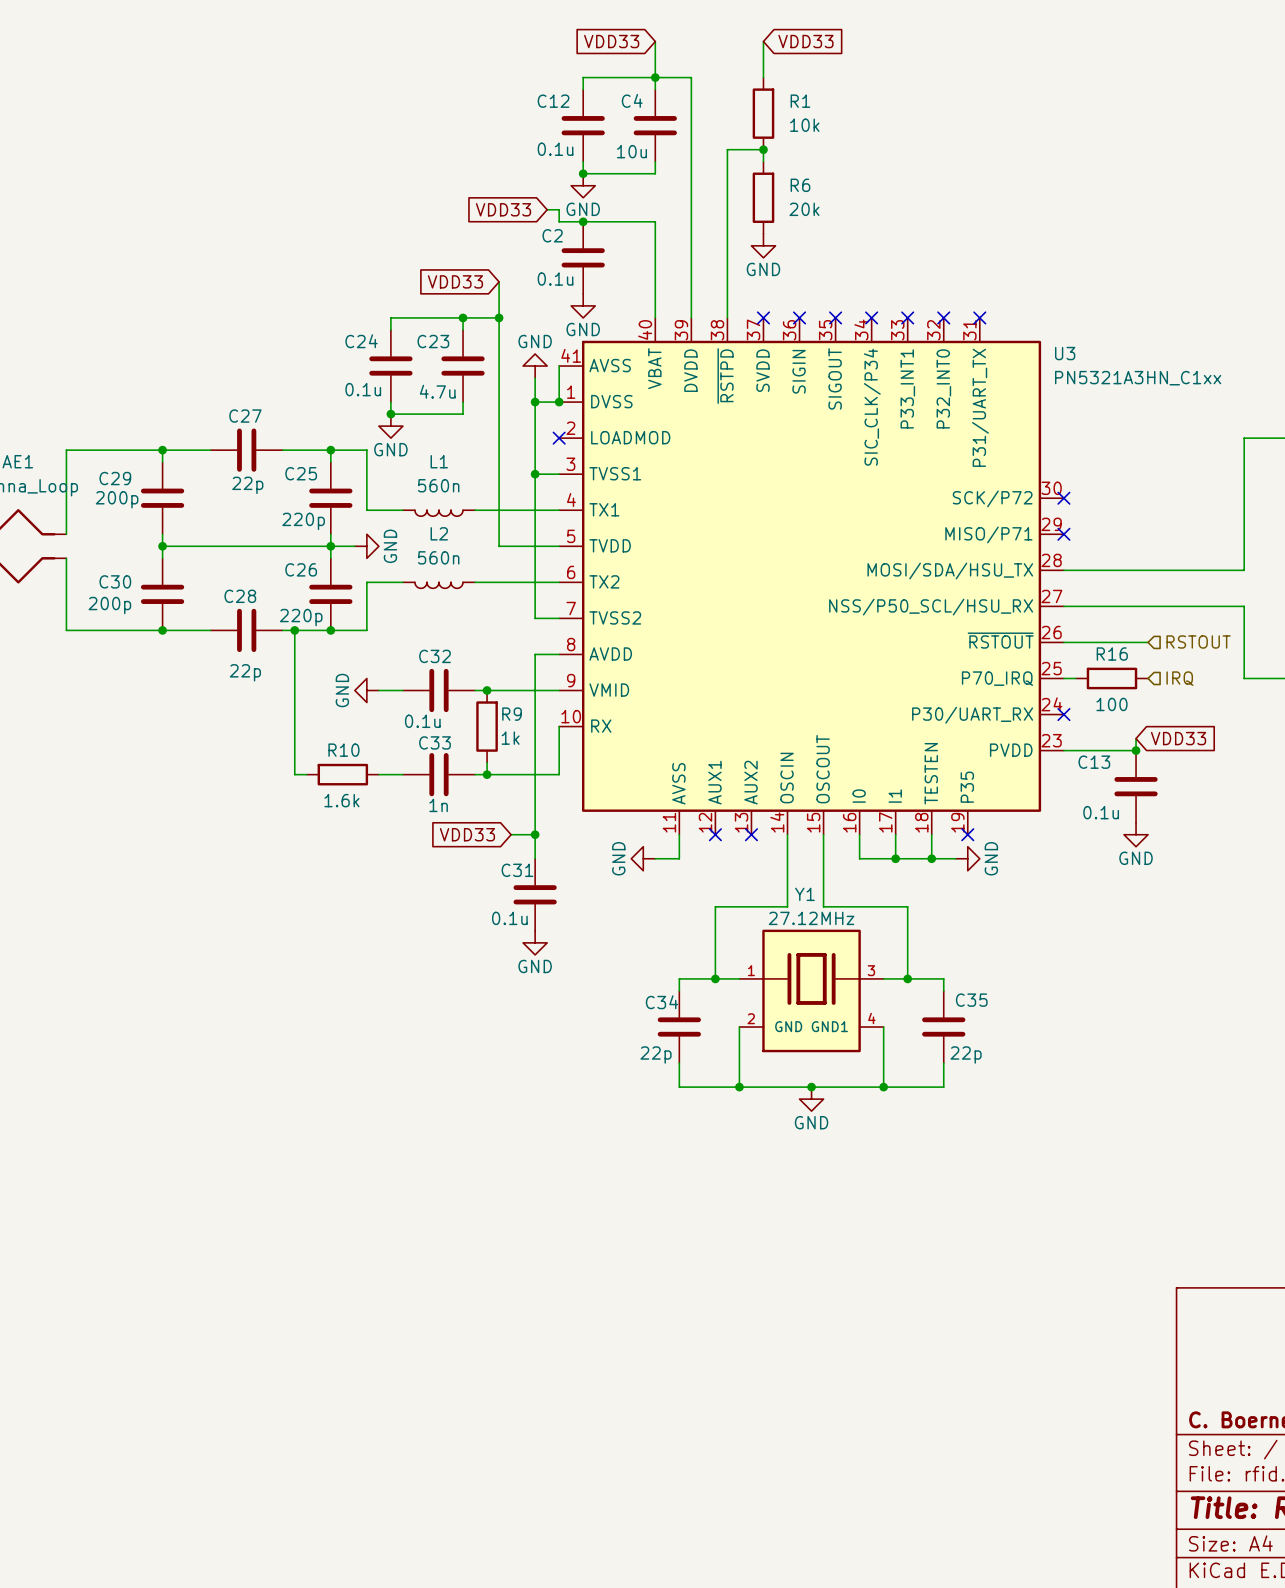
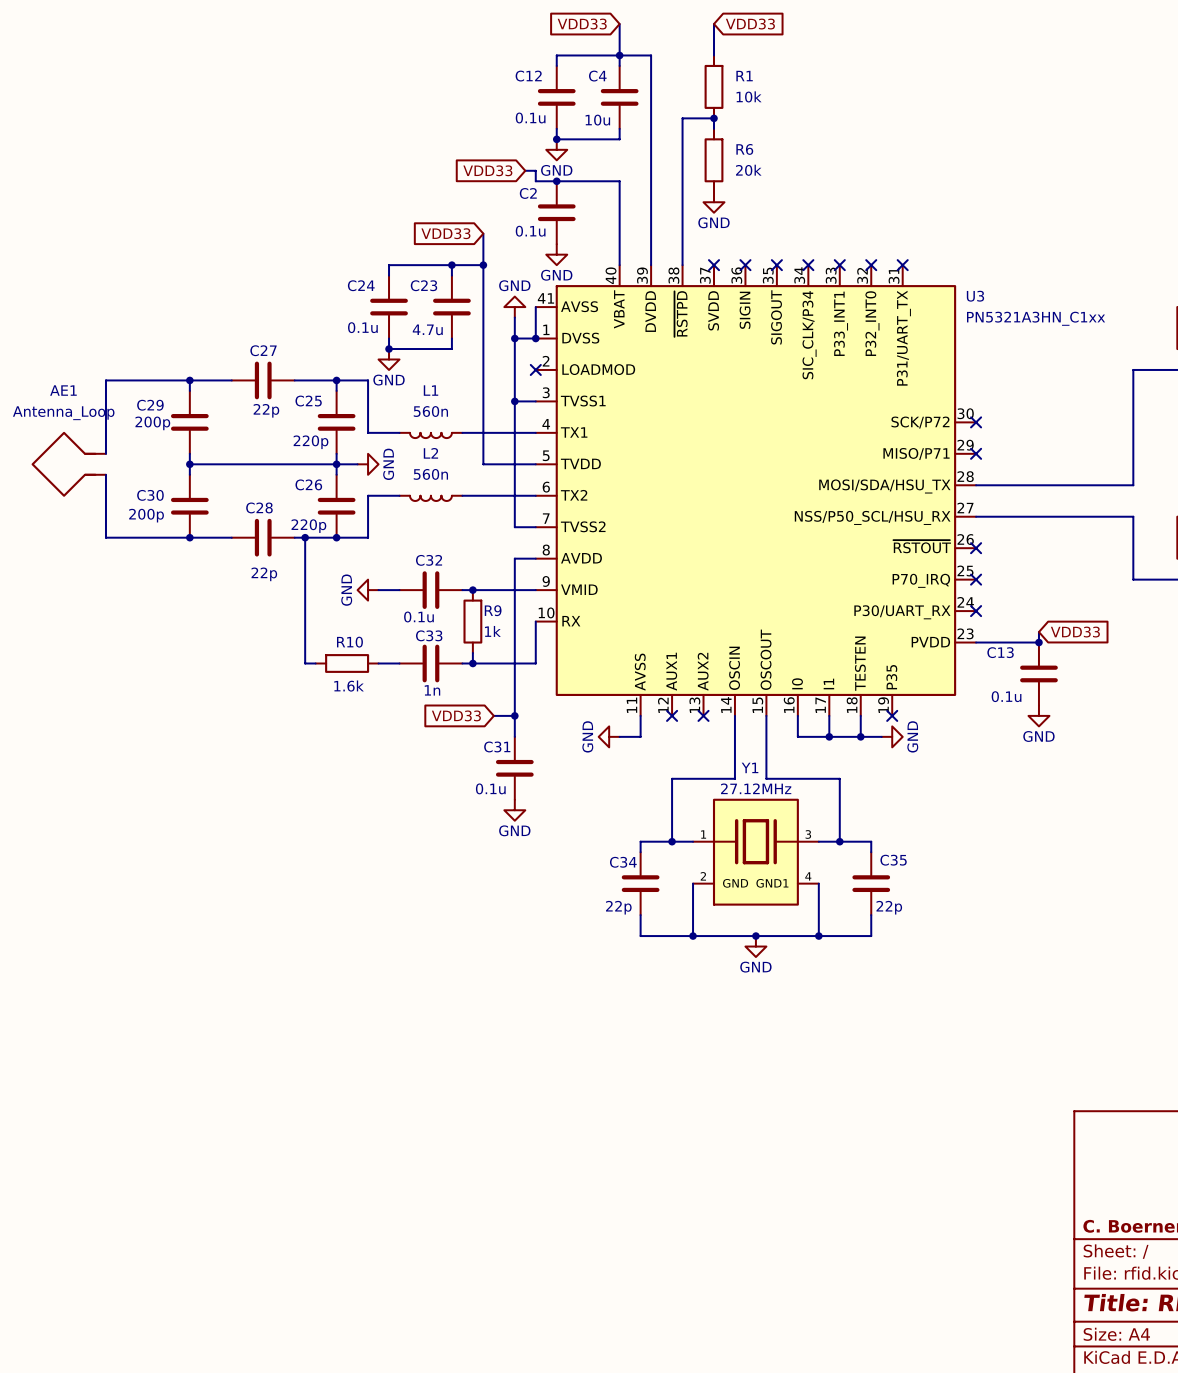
hierarchical label: RSTOUT (1198, 641) -> none
wire: (1063, 642) (1148, 642) -> none
no-connect mark: none -> (976, 548)
wire: (1063, 678) (1075, 678) -> none
no-connect mark: none -> (976, 579)
R16: 100 (1111, 678) -> none
hierarchical label: IRQ (1179, 678) -> none

